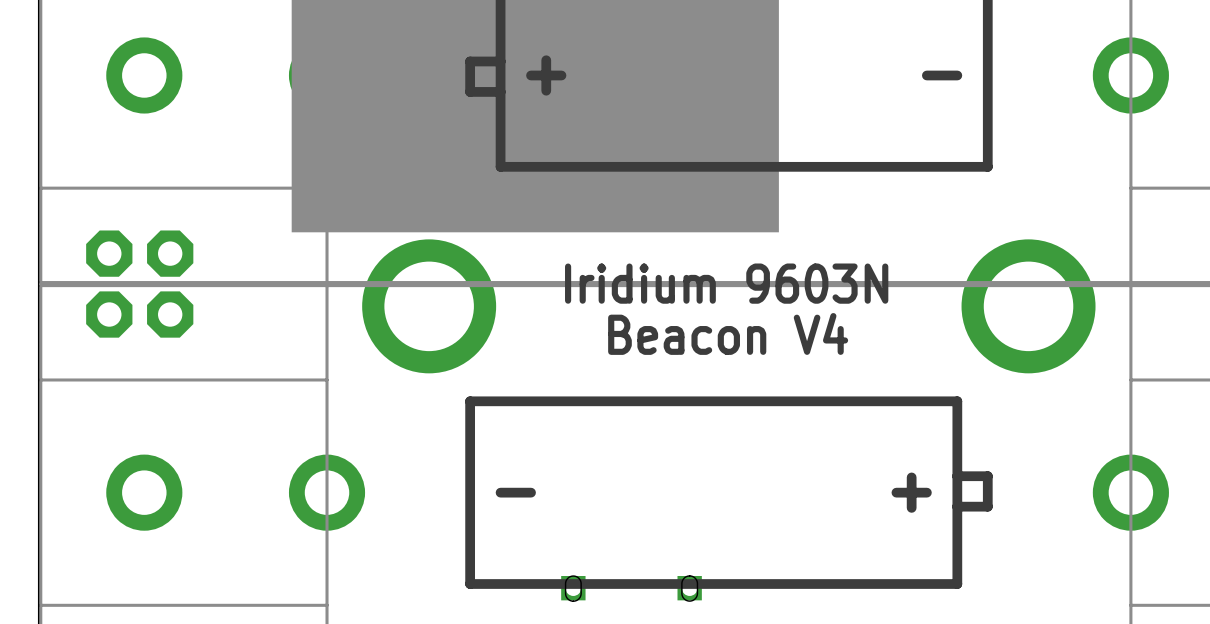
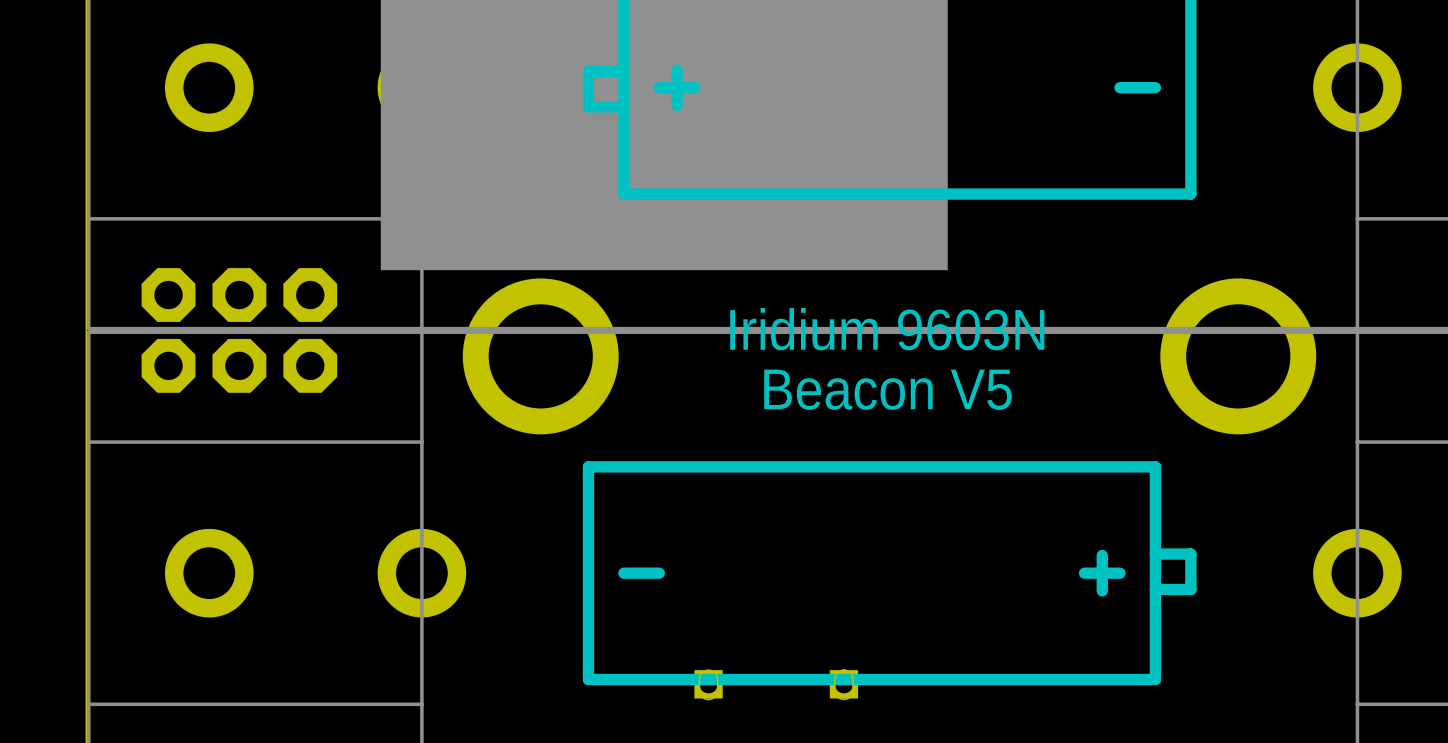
part: none -> (310, 295)
part: none -> (310, 365)
text: Beacon V4 (728, 333) -> Beacon V5 (888, 389)

